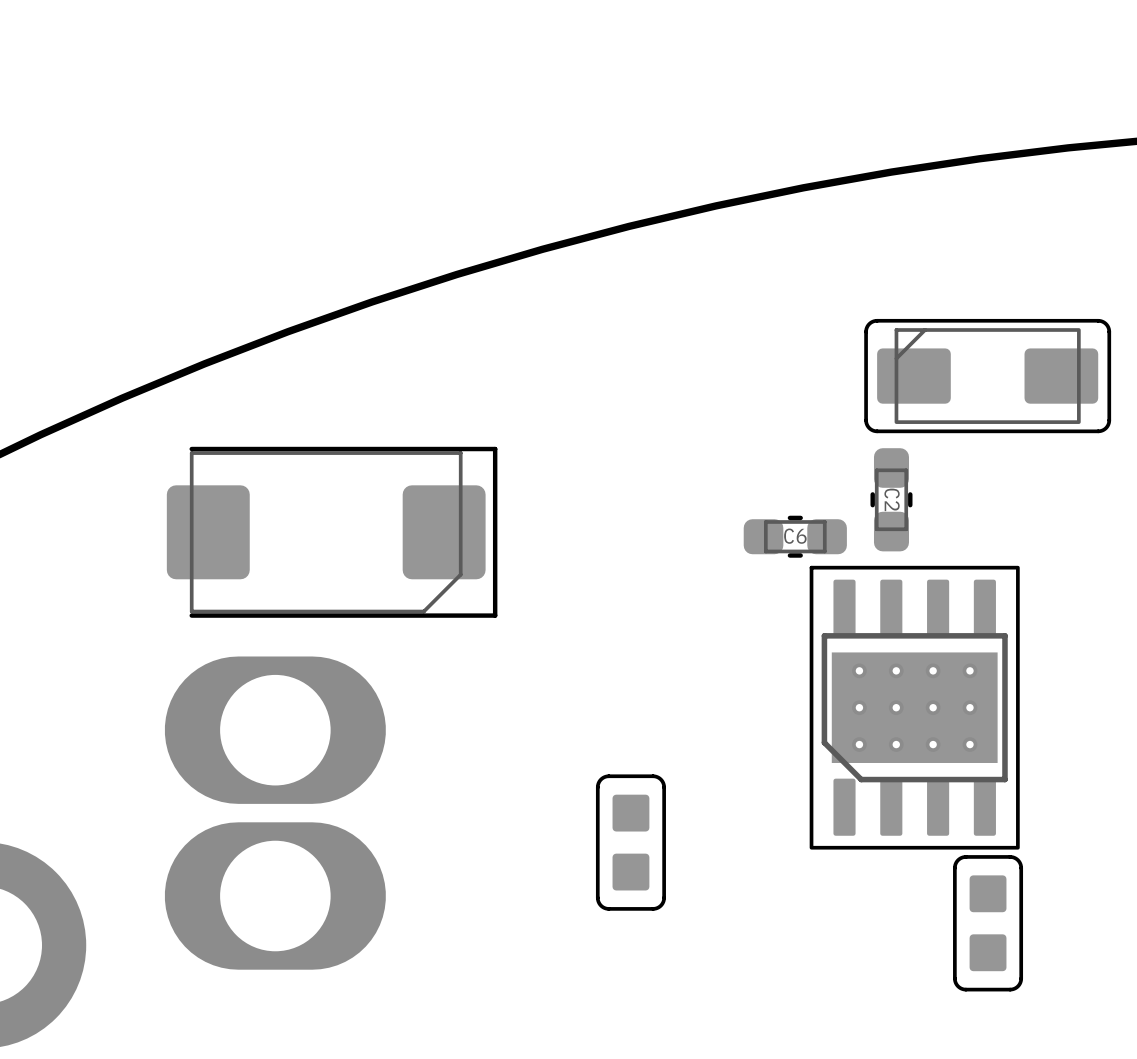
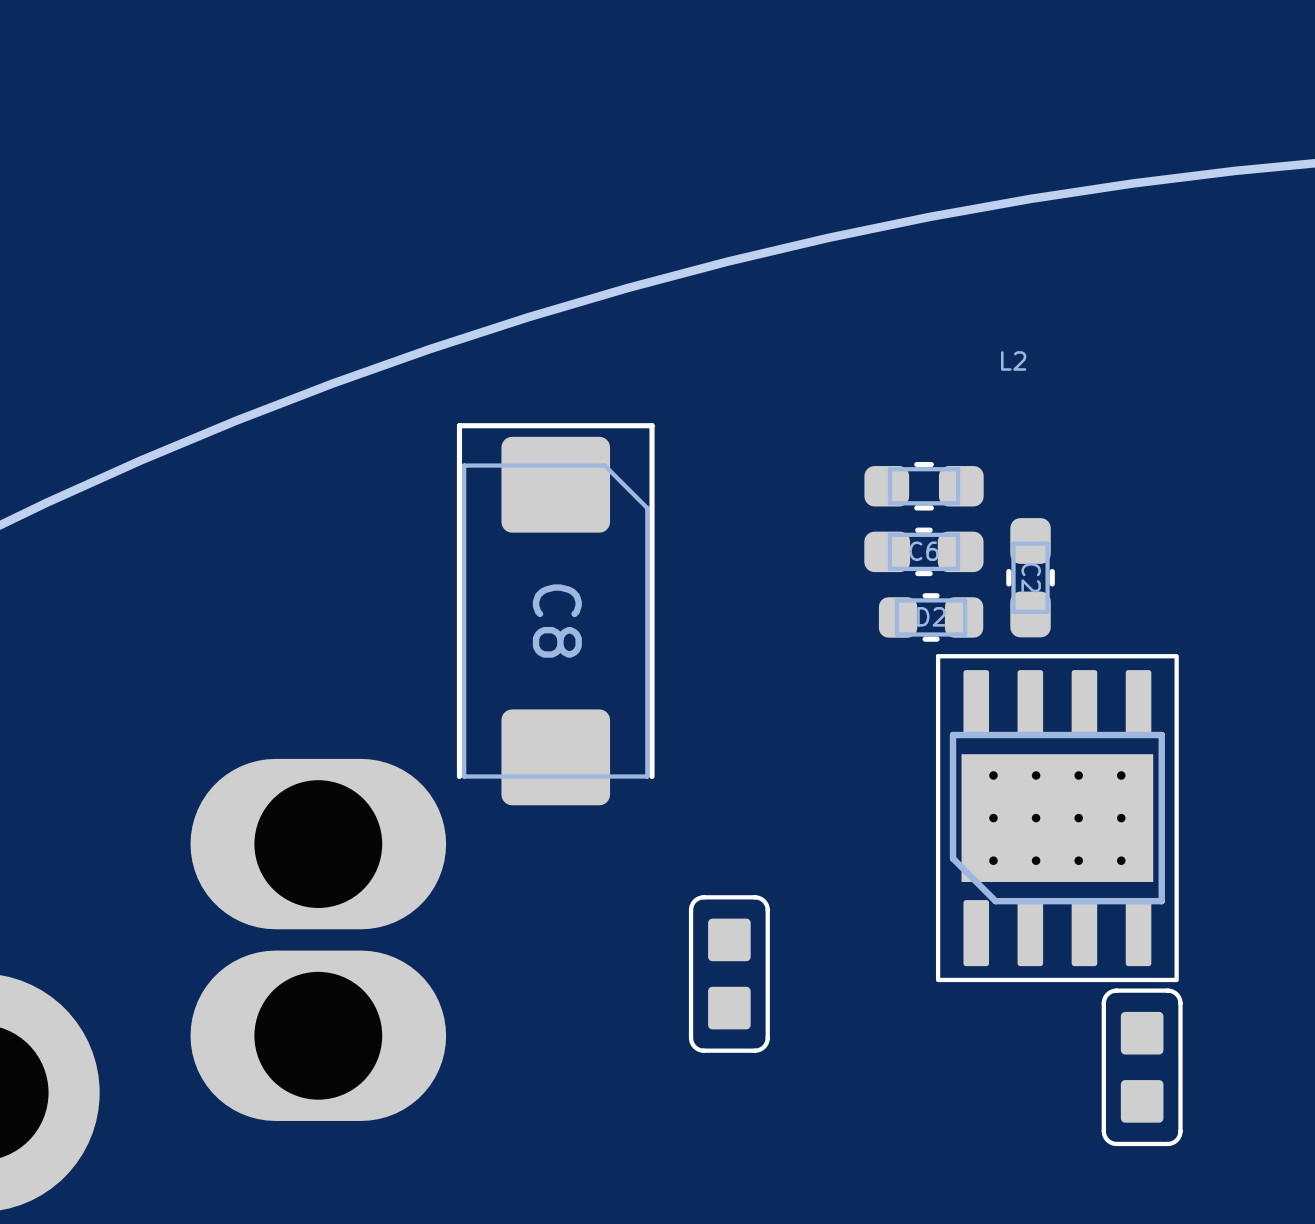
part: (987, 376) -> none
L2: none -> (924, 486)
C8: none -> (555, 614)
part: (332, 532) -> none
D2: none -> (931, 617)
C6 position: (795, 536) -> (923, 551)

